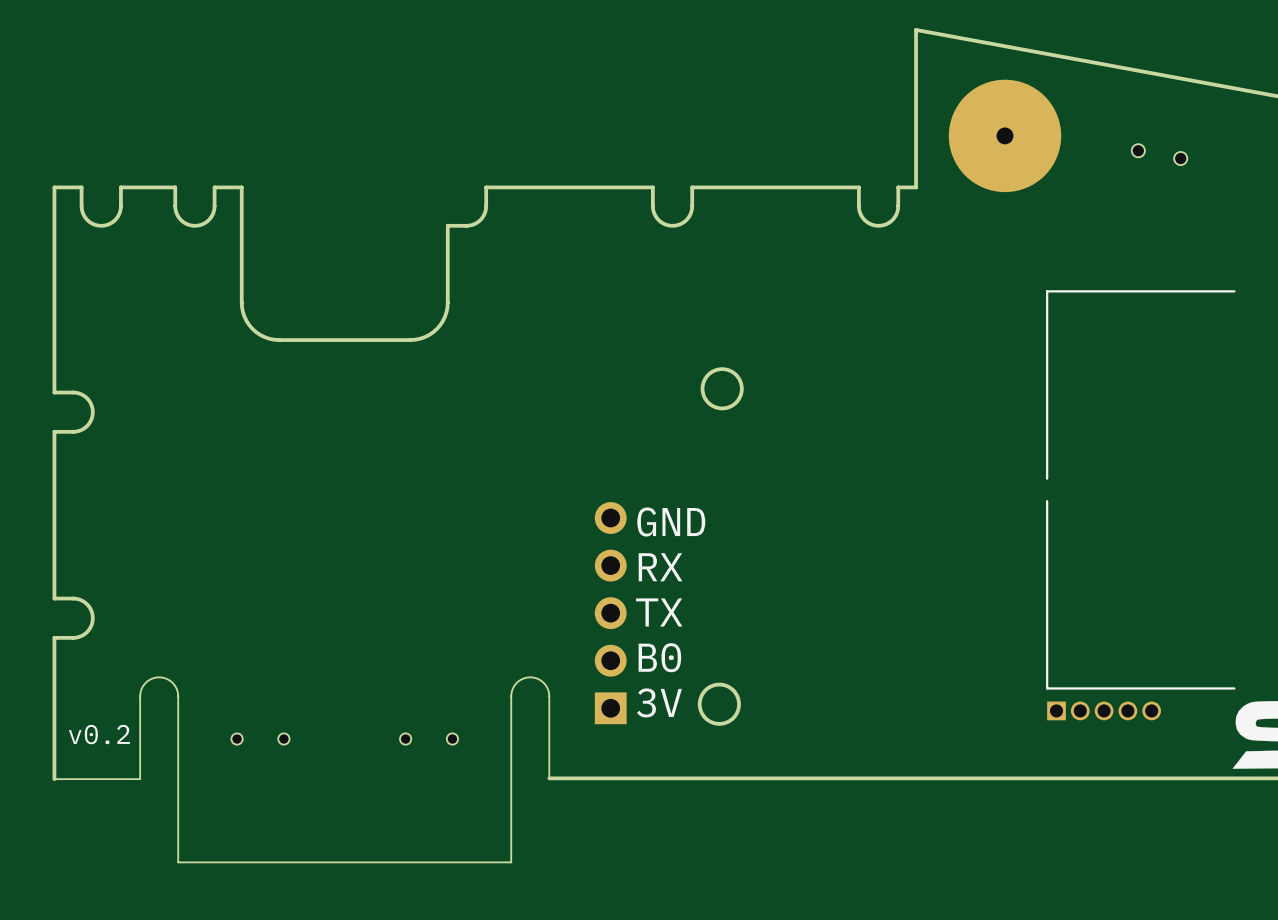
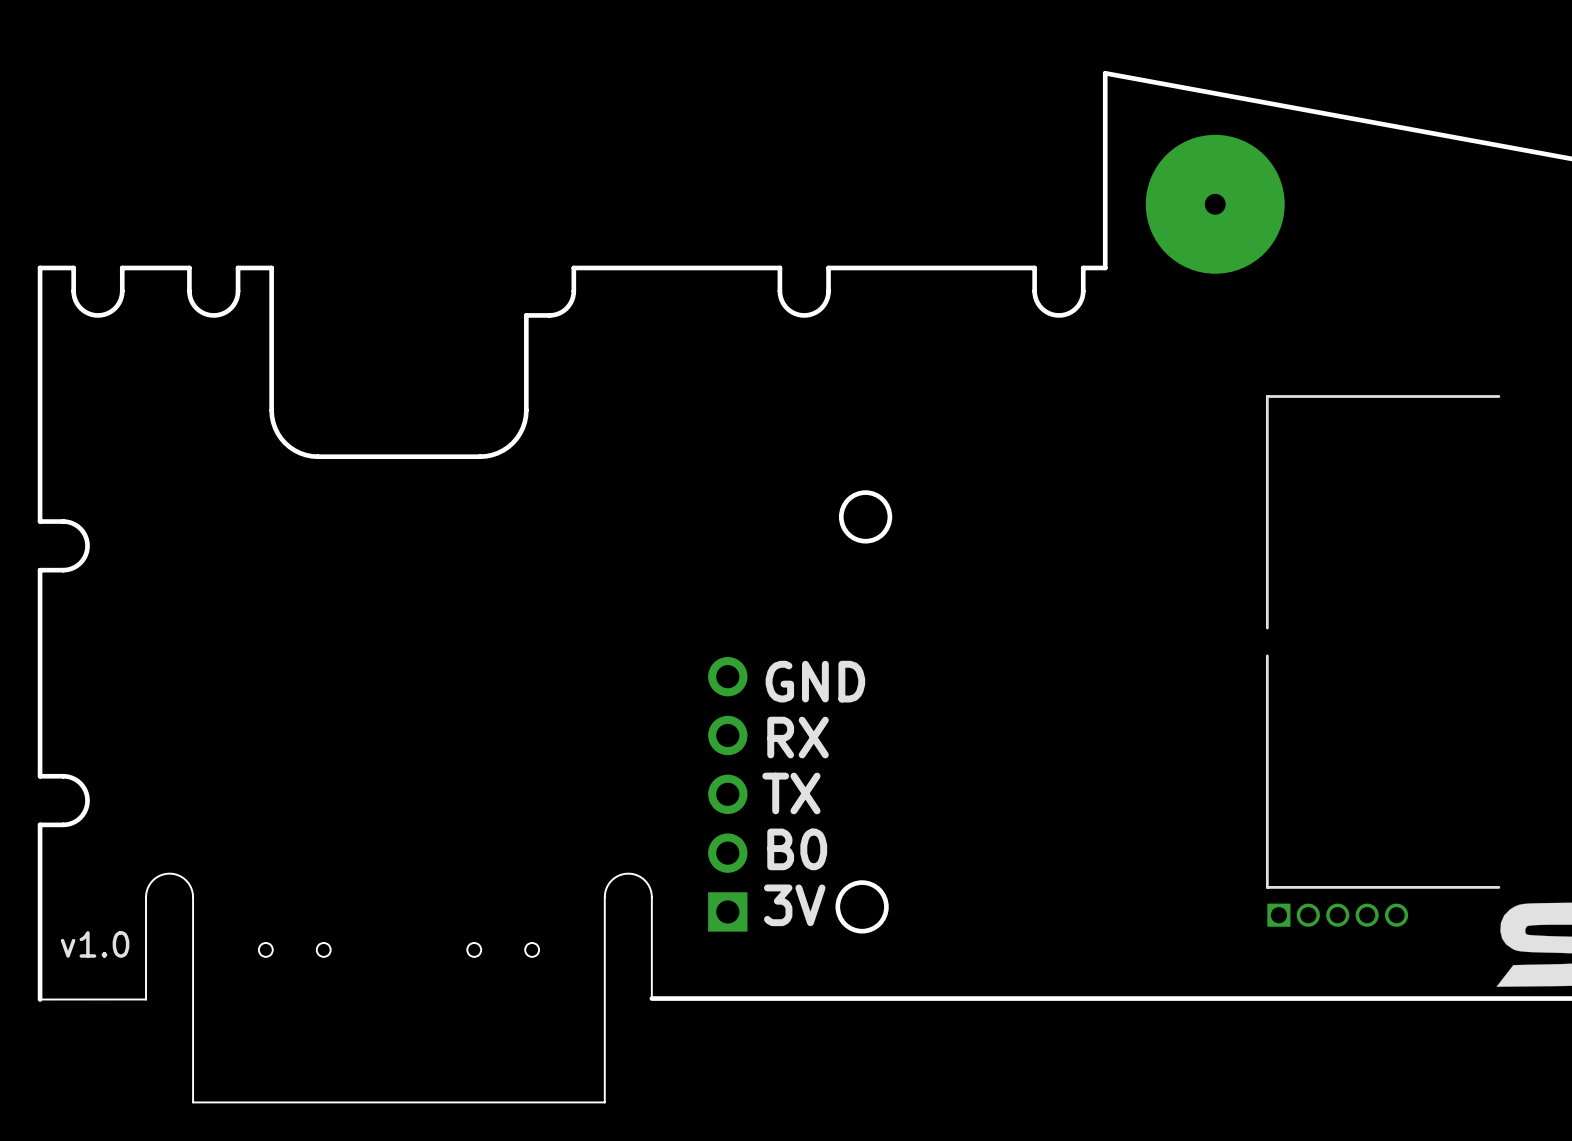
part: (1159, 154) -> none
text: v0.2 (99, 734) -> v1.0 (95, 944)

